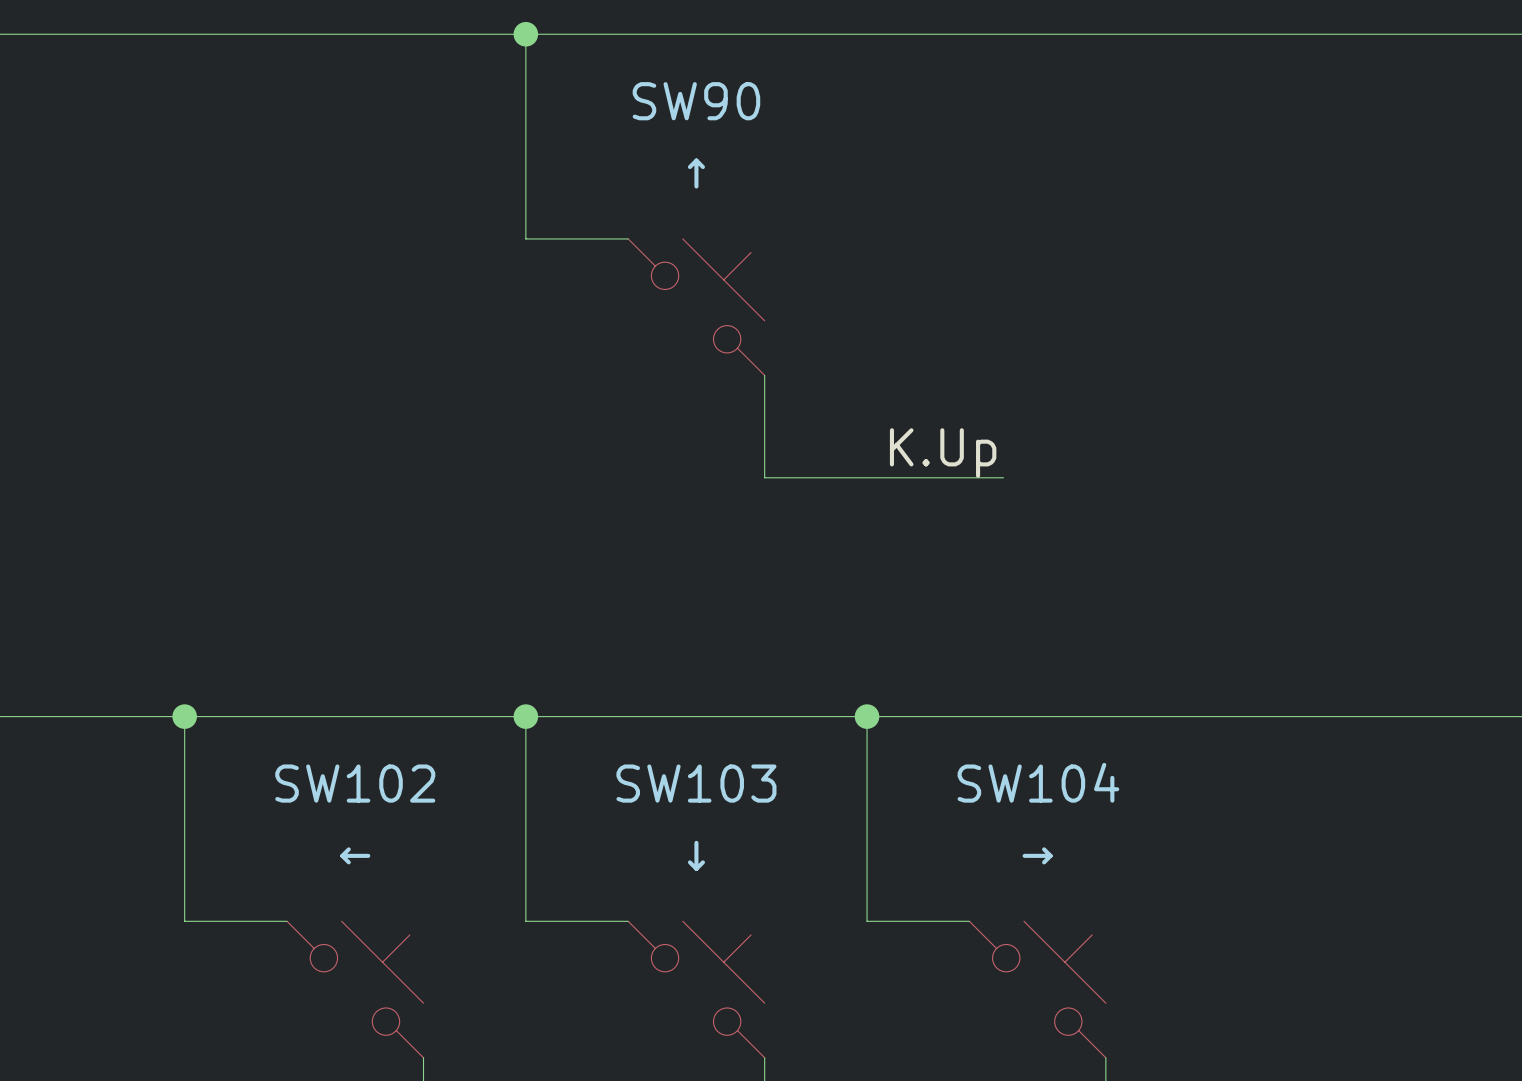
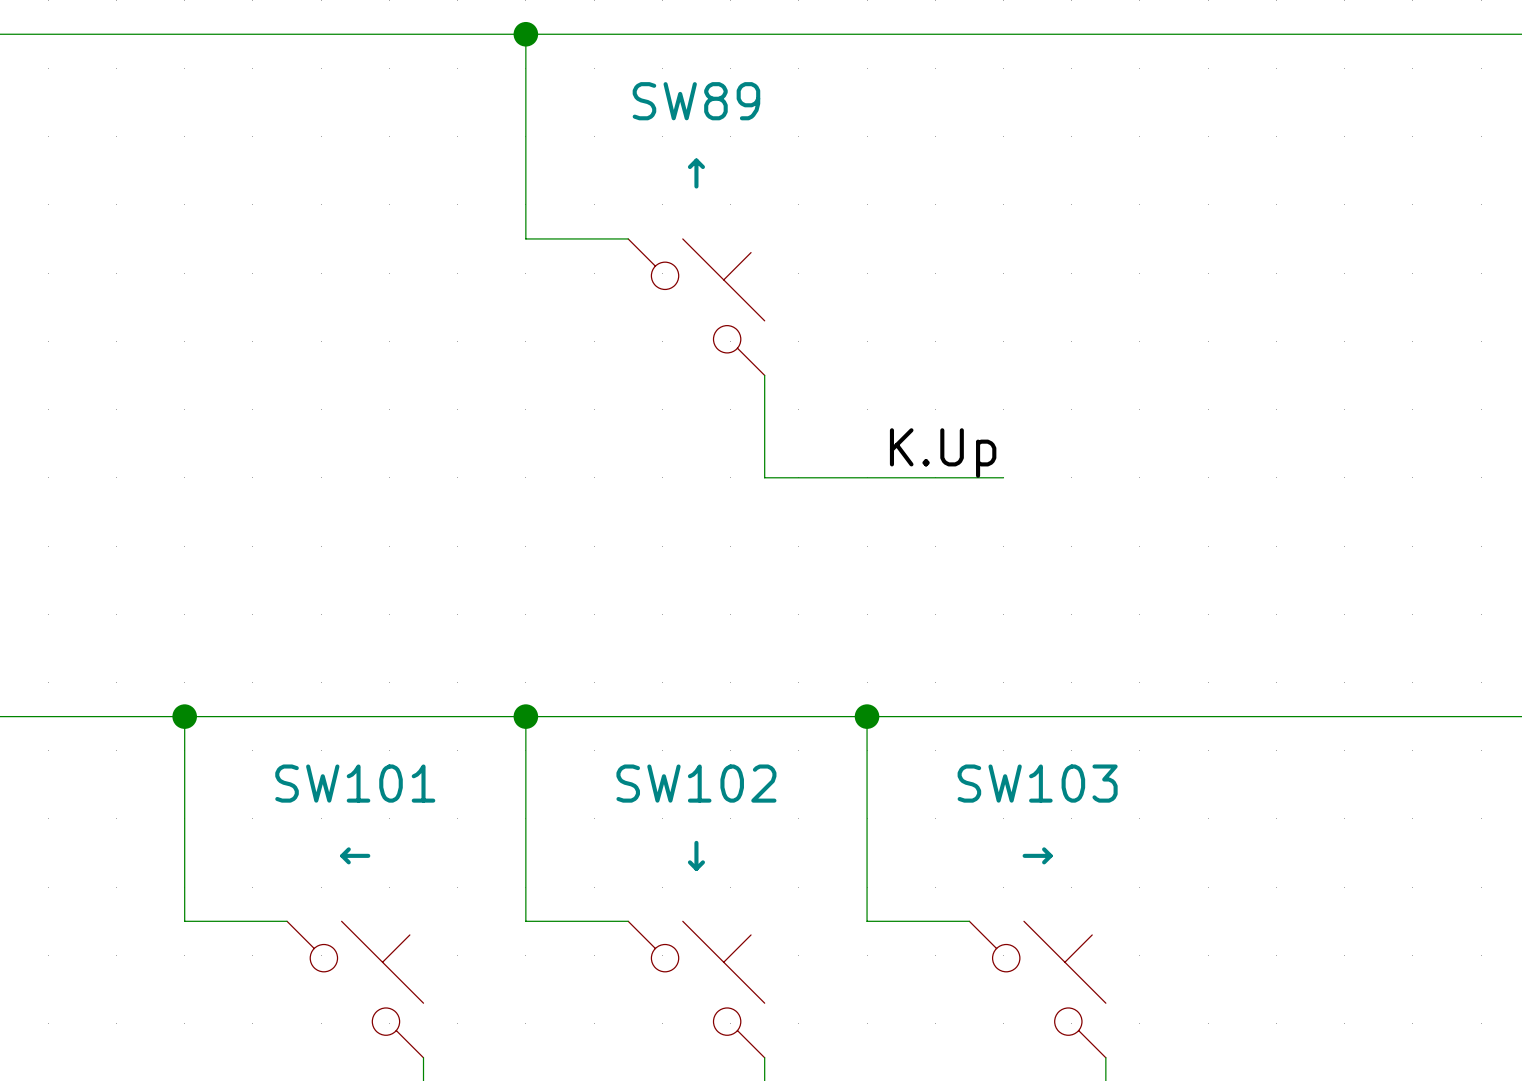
SW90 name: SW90 (696, 101) -> SW89 (696, 101)
SW104 name: SW104 (1038, 782) -> SW103 (1037, 783)
SW102 name: SW102 (355, 783) -> SW101 (355, 783)
SW103 name: SW103 (696, 783) -> SW102 (696, 783)

